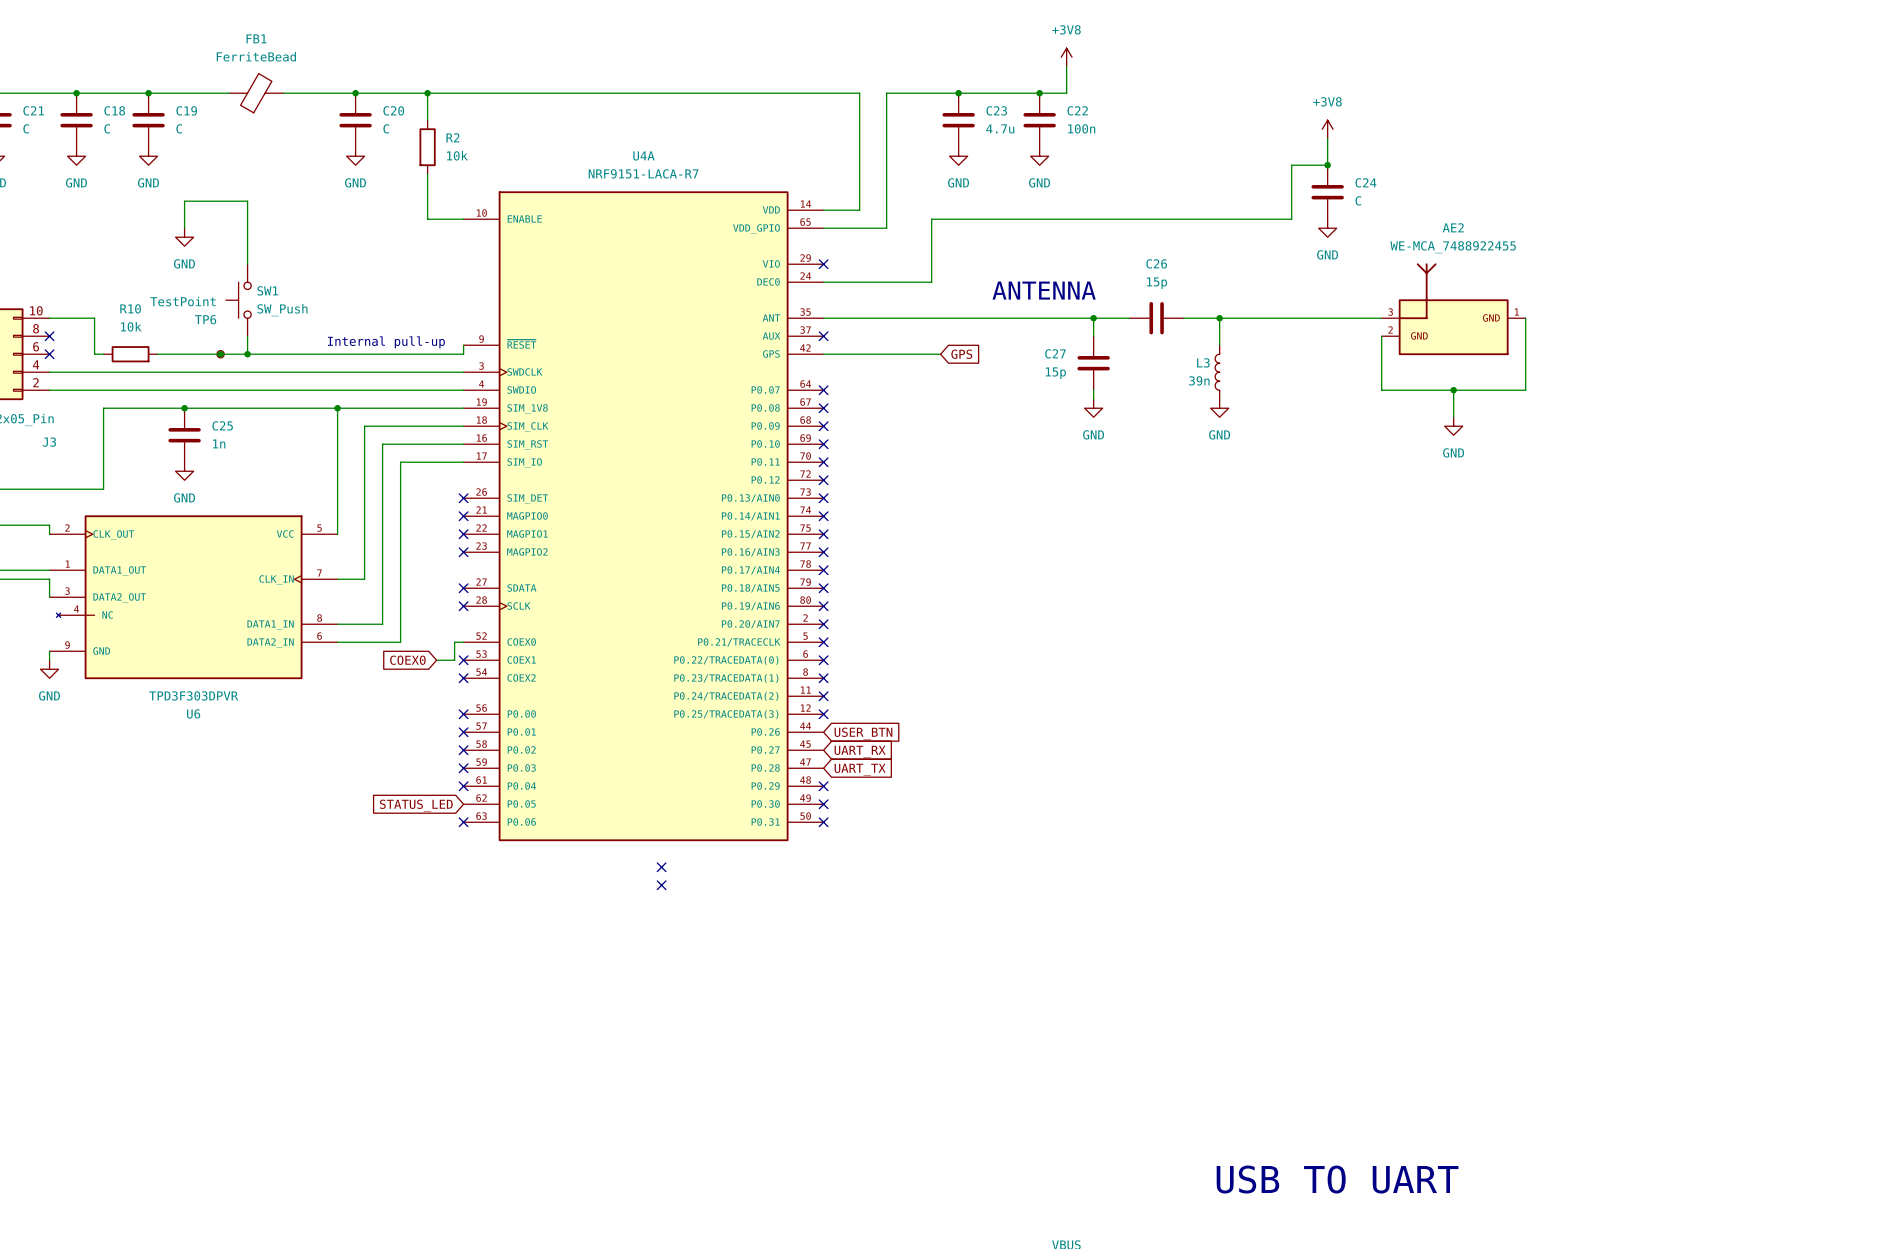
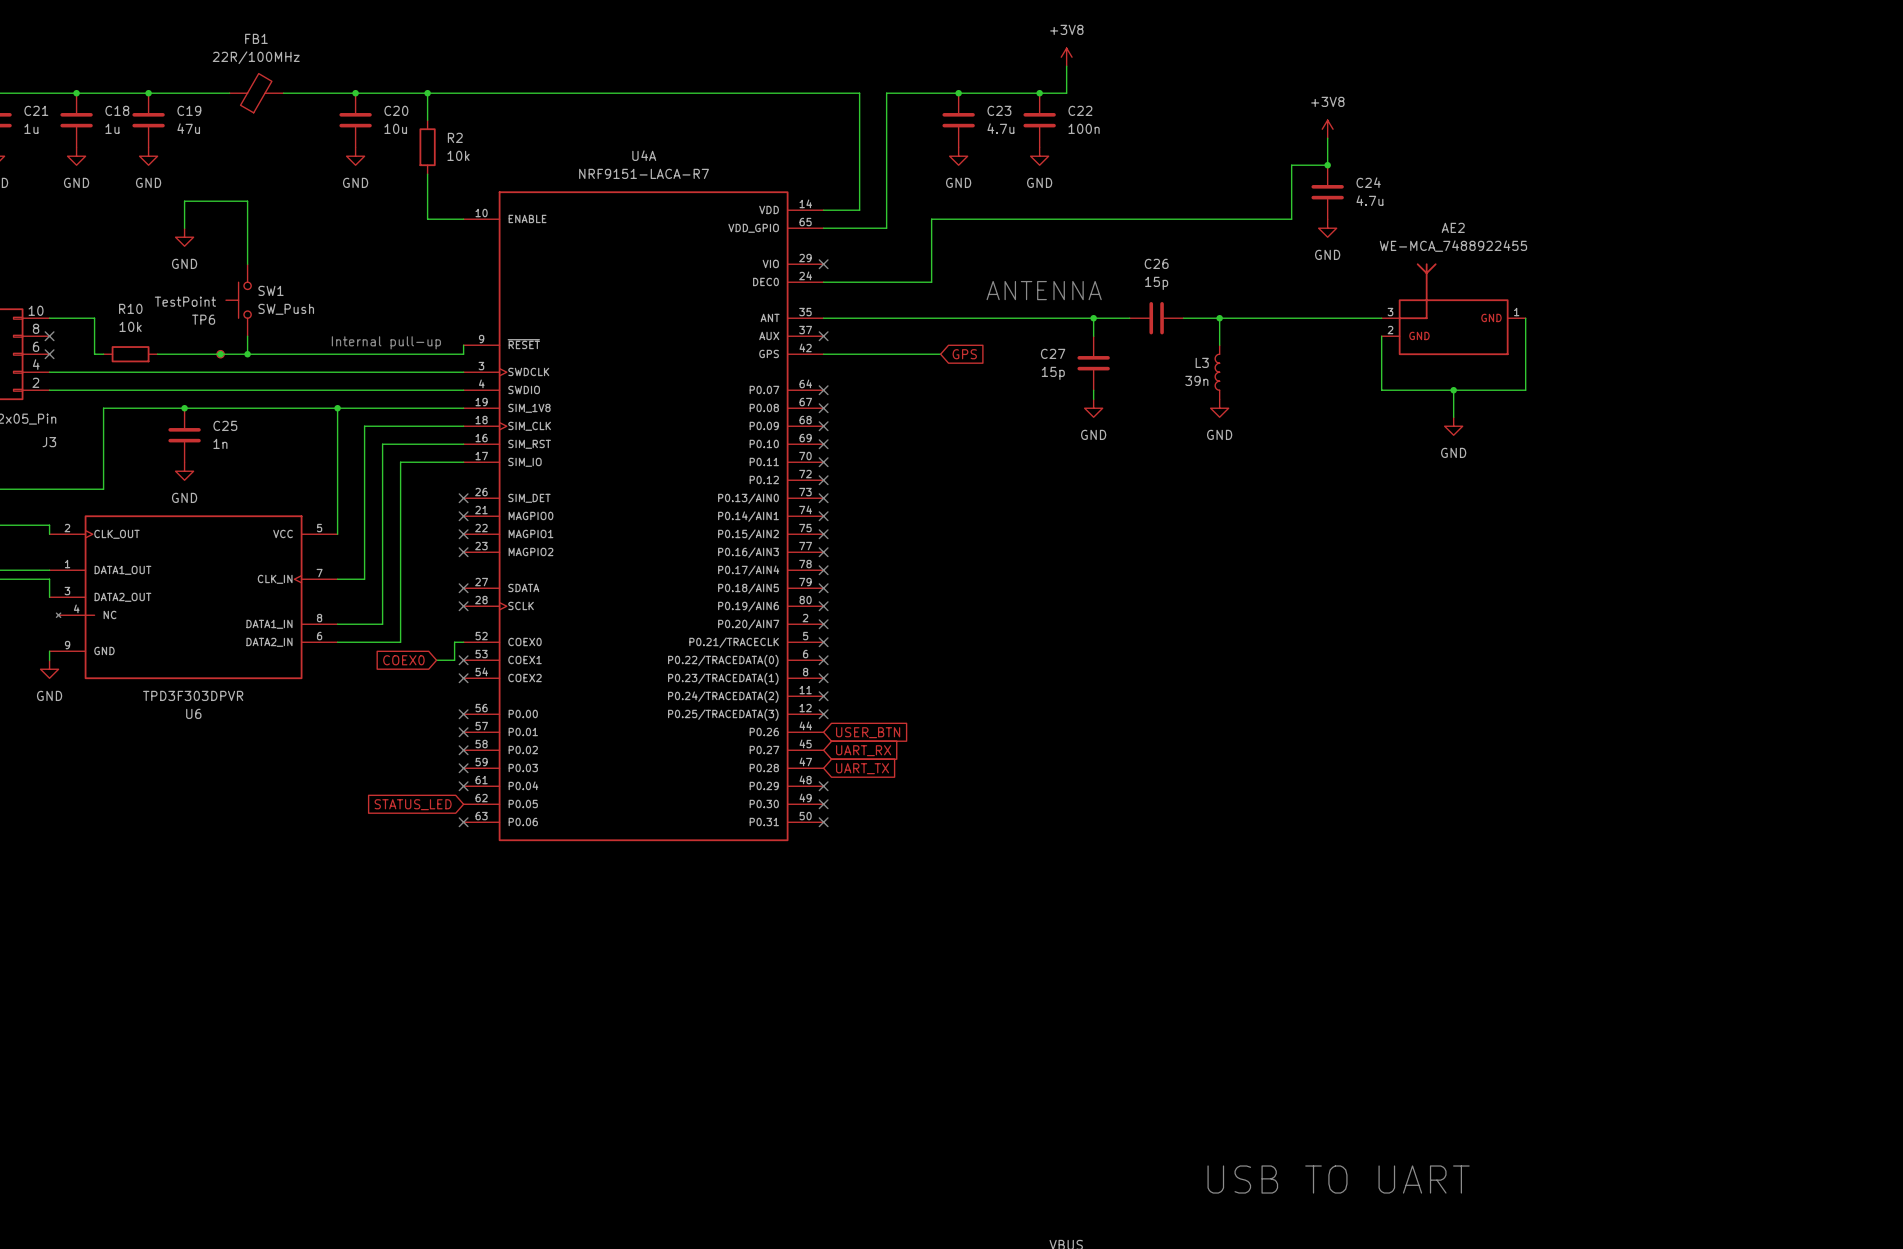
FB1 value: FerriteBead (256, 56) -> 22R/100MHz (256, 57)
C21 value: C (26, 128) -> 1u (31, 128)
C18 value: C (107, 128) -> 1u (112, 128)
C19 value: C (179, 128) -> 47u (188, 128)
C20 value: C (386, 128) -> 10u (395, 128)
C24 value: C (1358, 200) -> 4.7u (1369, 200)
no-connect mark: (661, 867) -> none
no-connect mark: (661, 885) -> none

